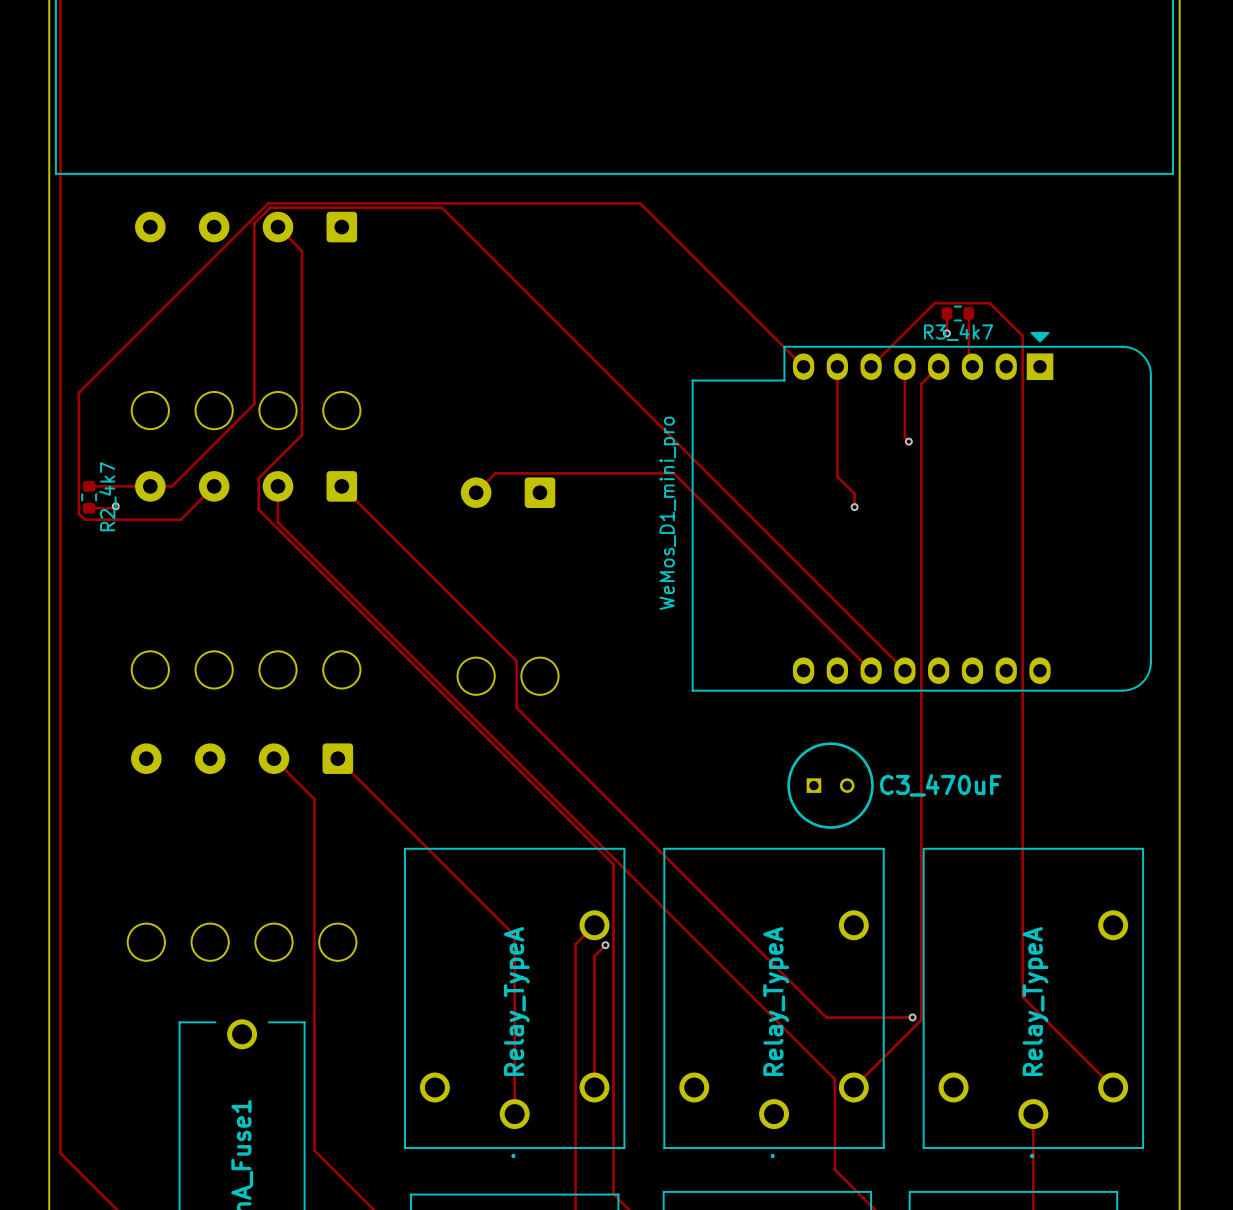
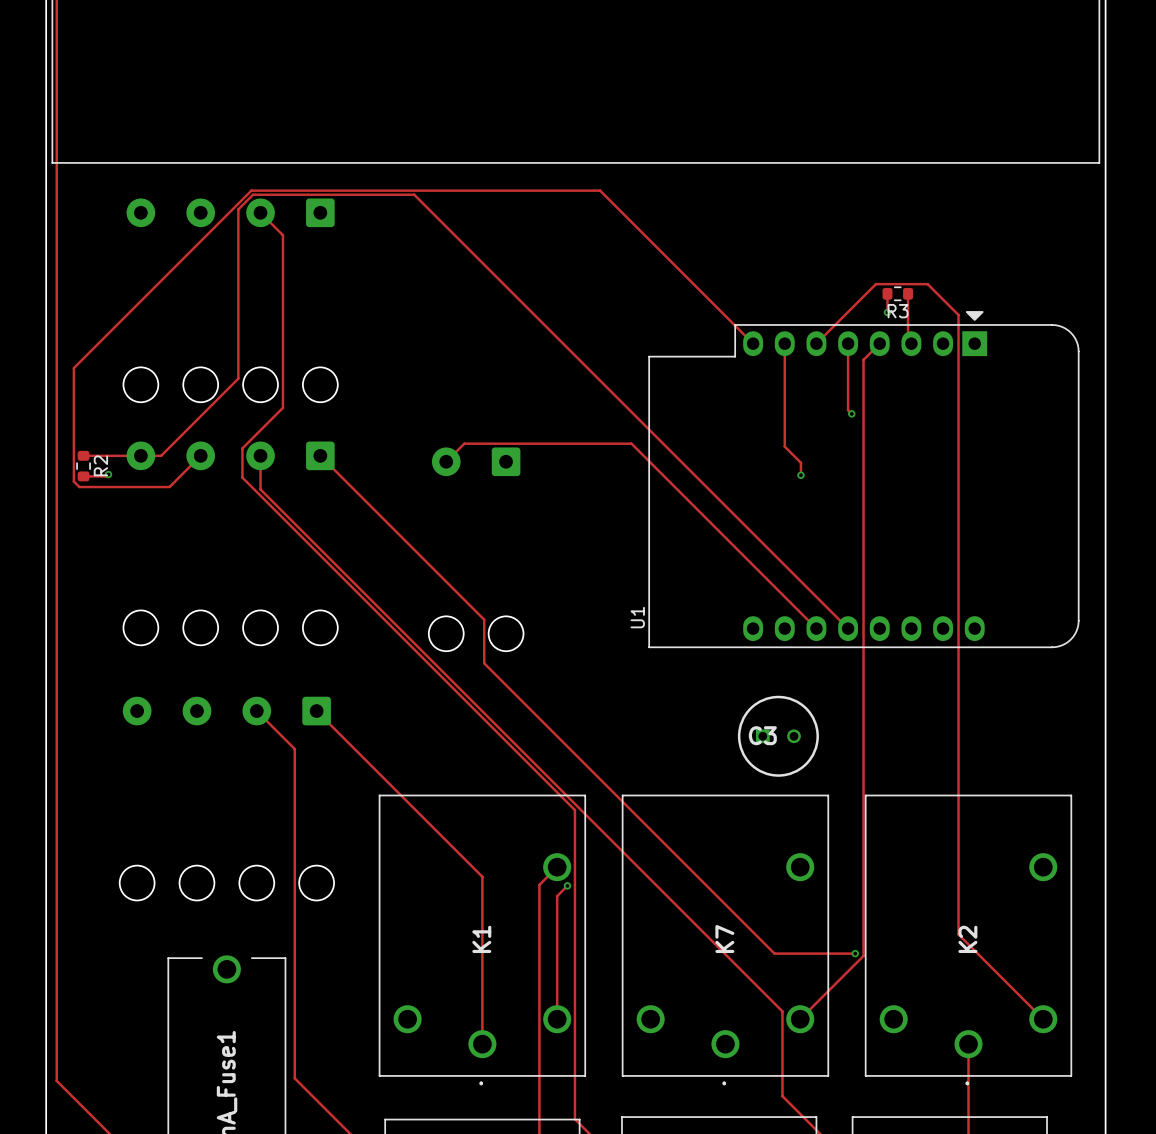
R3_4k7 name: R3_4k7 (958, 332) -> R3 (898, 311)
R2_4k7 name: R2_4k7 (107, 496) -> R2 (100, 465)
WeMos_D1_mini_pro name: WeMos_D1_mini_pro (669, 513) -> U1 (637, 617)
C3_470uF name: C3_470uF (940, 785) -> C3 (762, 735)
Relay_TypeA name: Relay_TypeA (516, 1001) -> K1 (481, 939)
Relay_TypeA name: Relay_TypeA (776, 1001) -> K7 (724, 939)
Relay_TypeA name: Relay_TypeA (1035, 1001) -> K2 (967, 939)

